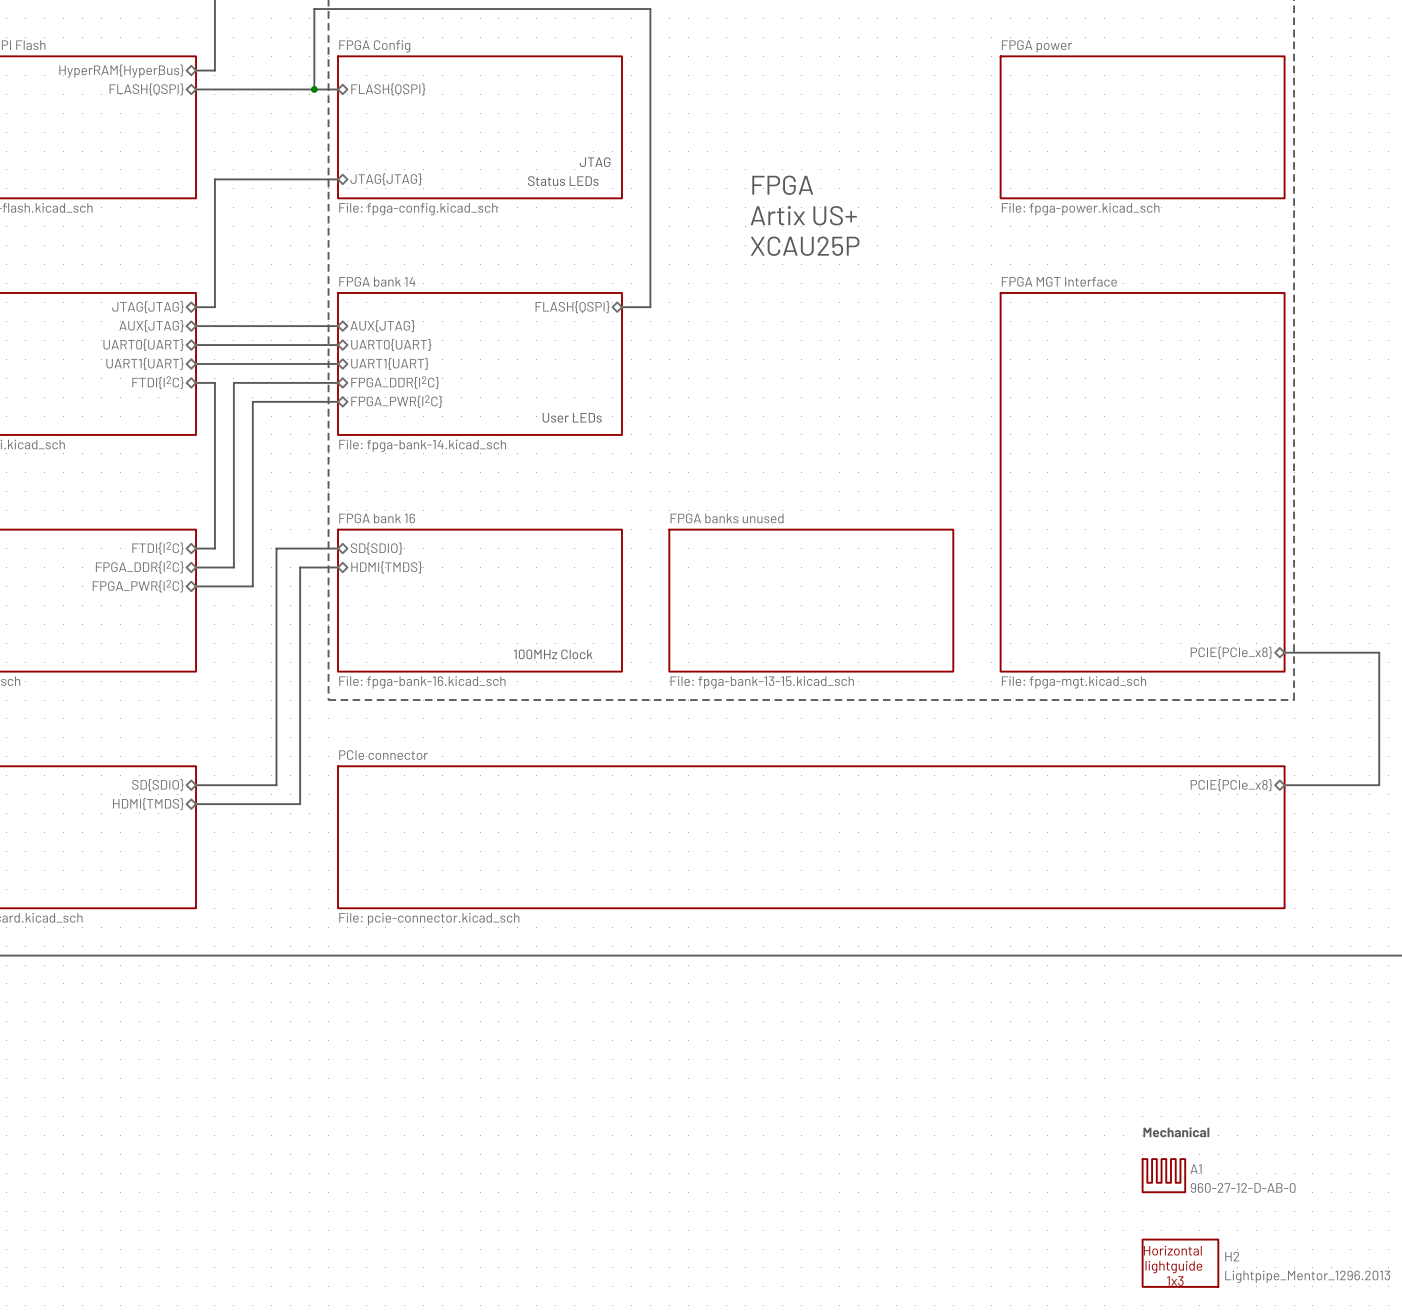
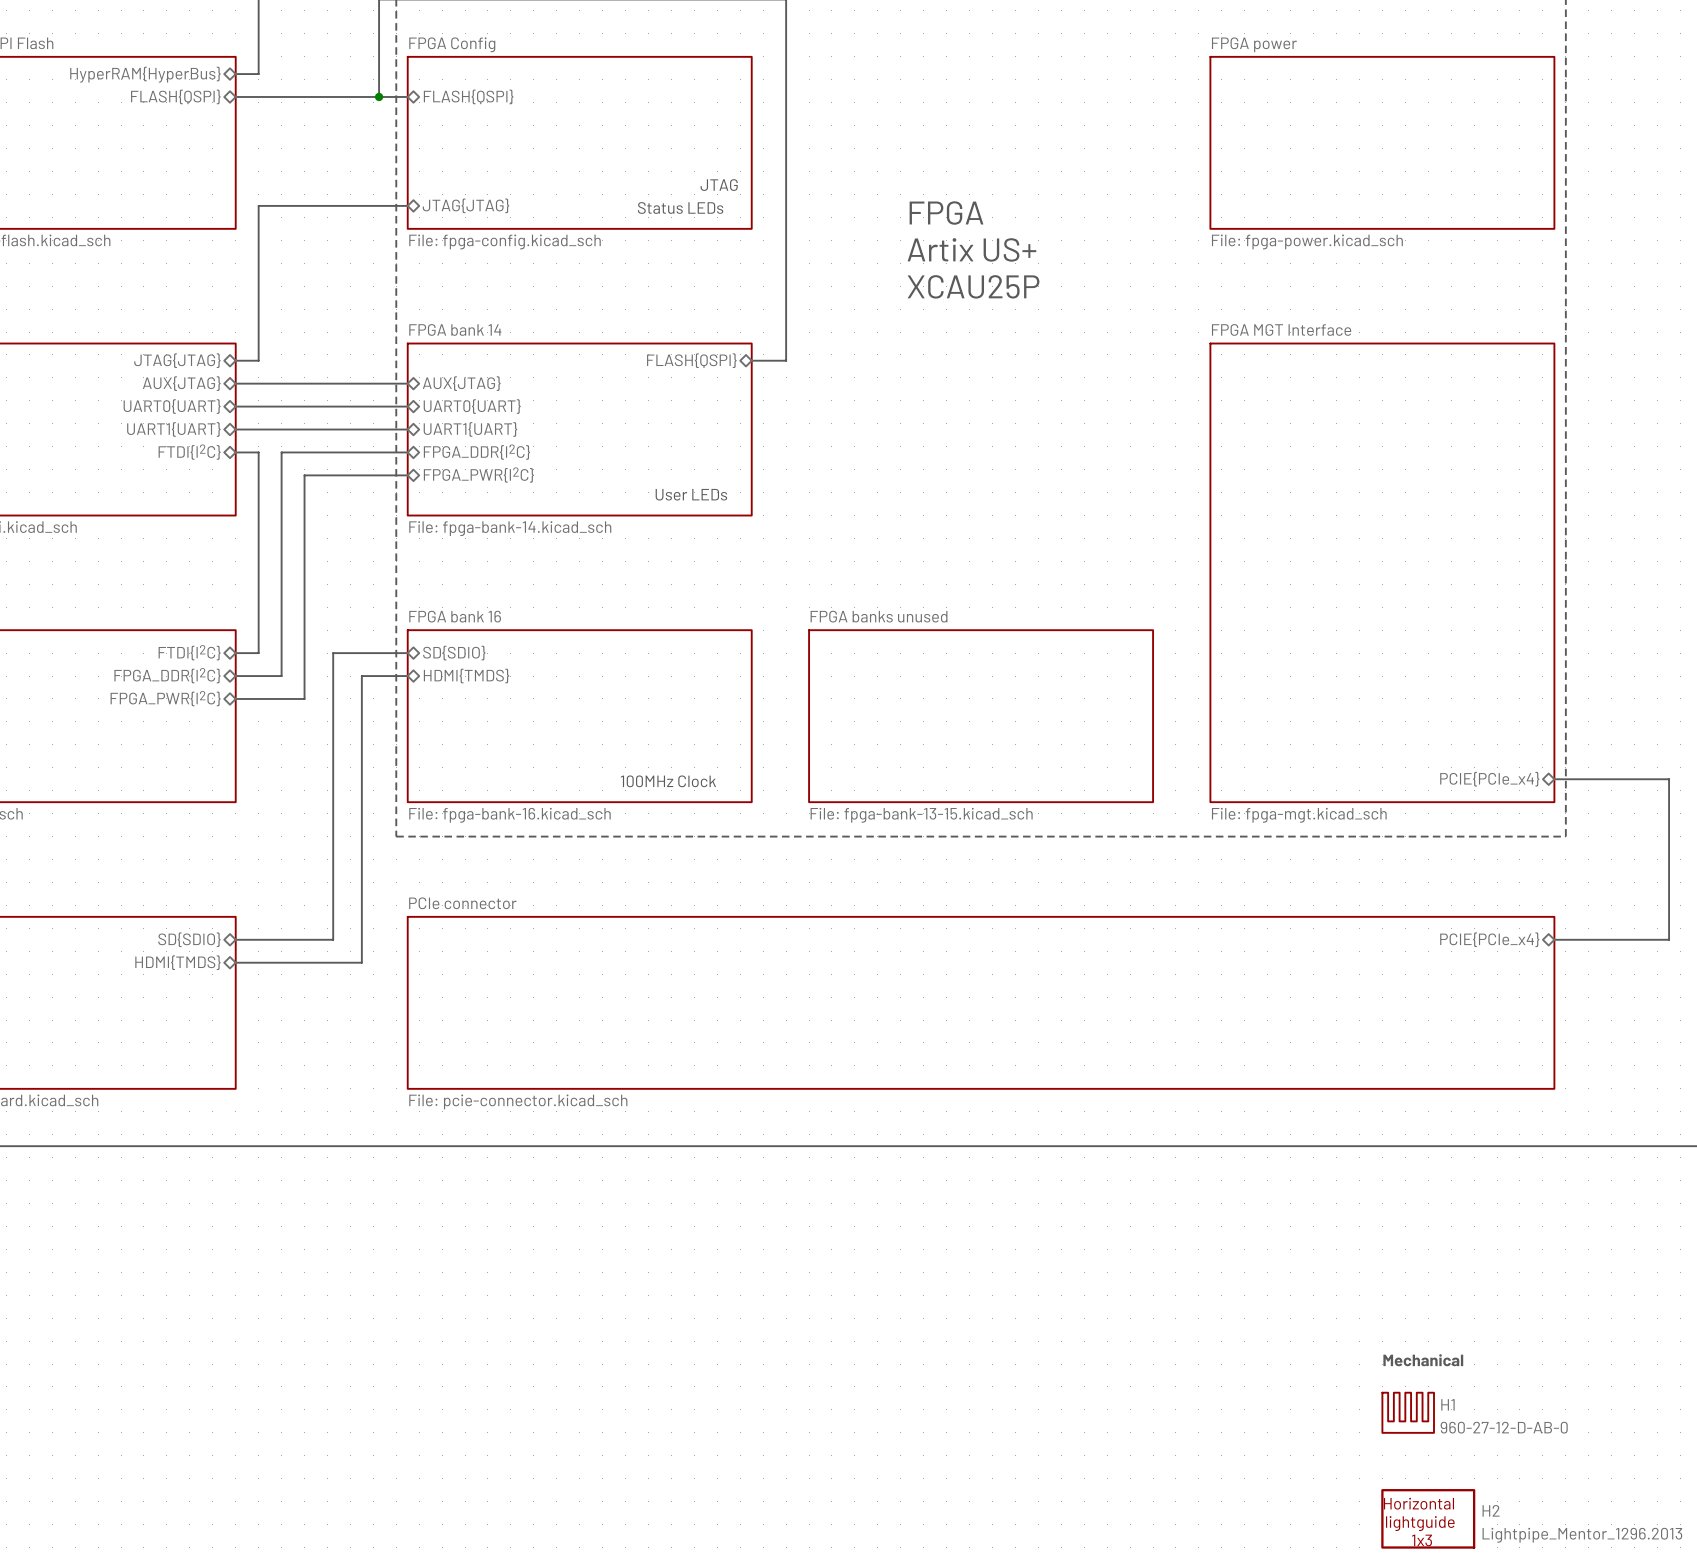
sheet pin: PCIE{PCIe_x8} (1231, 652) -> PCIE{PCIe_x4} (1489, 779)
sheet pin: PCIE{PCIe_x8} (1231, 785) -> PCIE{PCIe_x4} (1489, 939)
A1 name: A1 (1195, 1169) -> H1 (1447, 1404)

